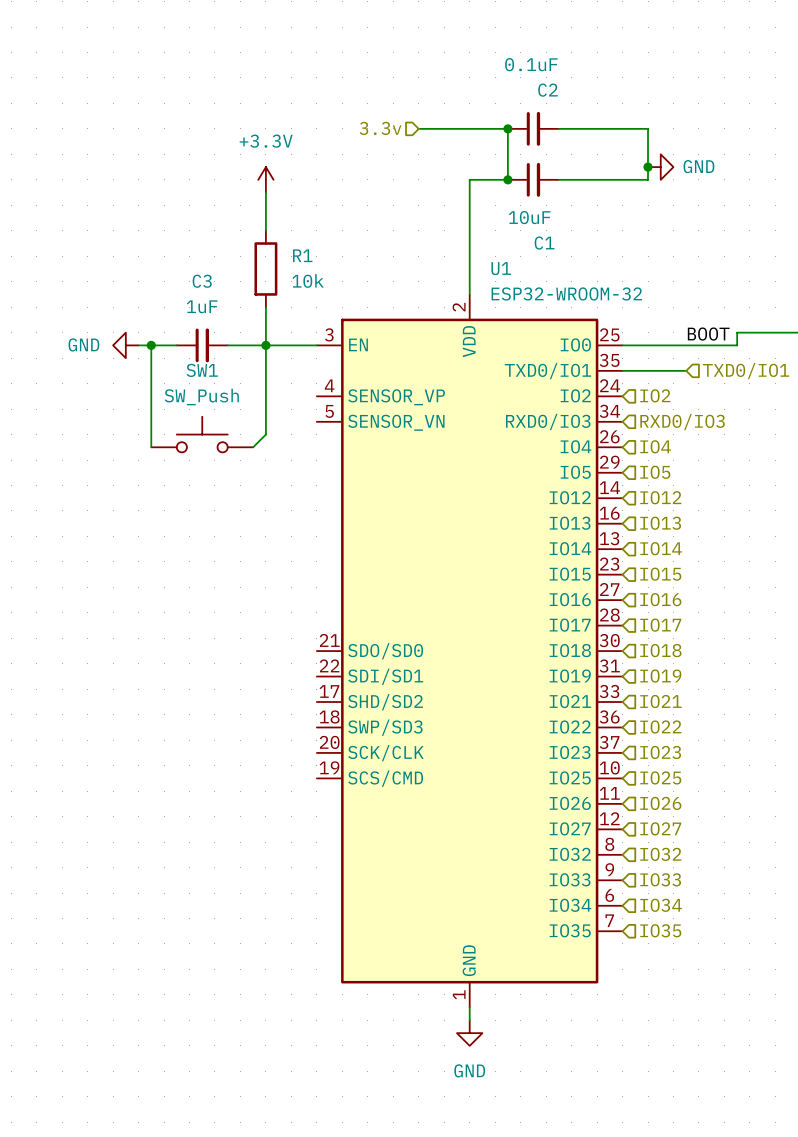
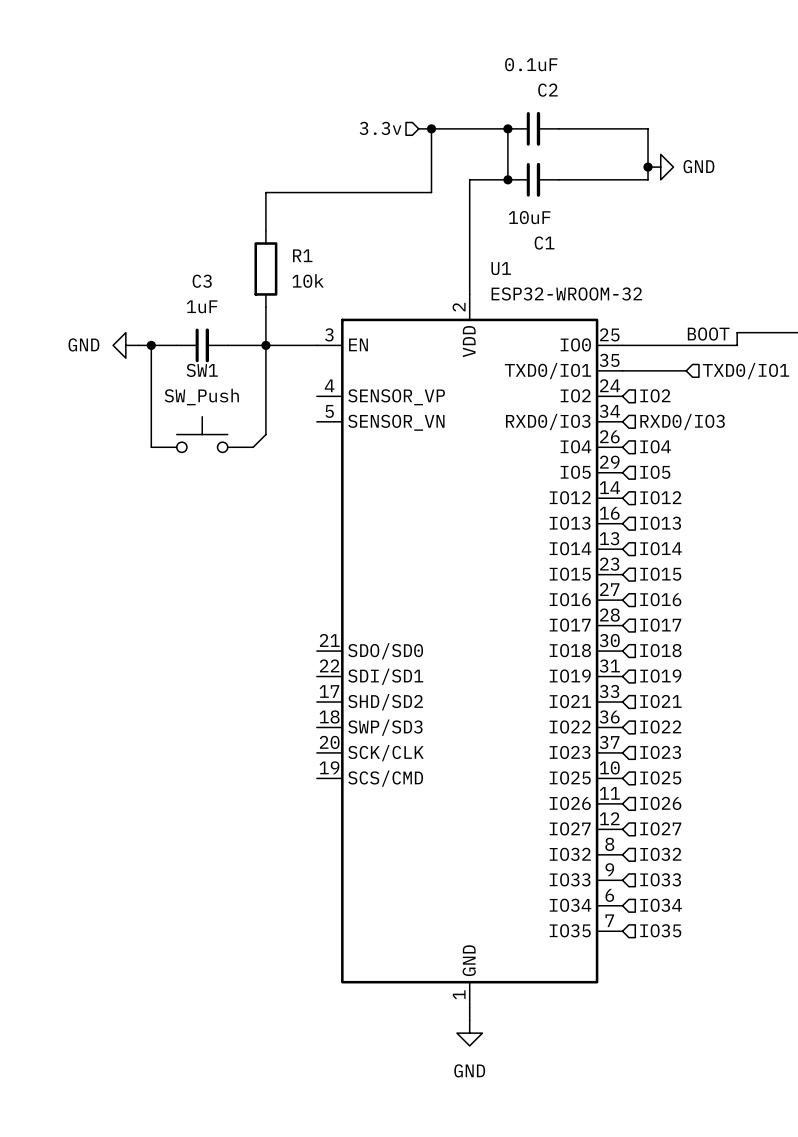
wire: none -> (431, 128) (431, 192) (265, 192)
junction: none -> (431, 128)
power symbol: +3.3V (265, 179) -> none

